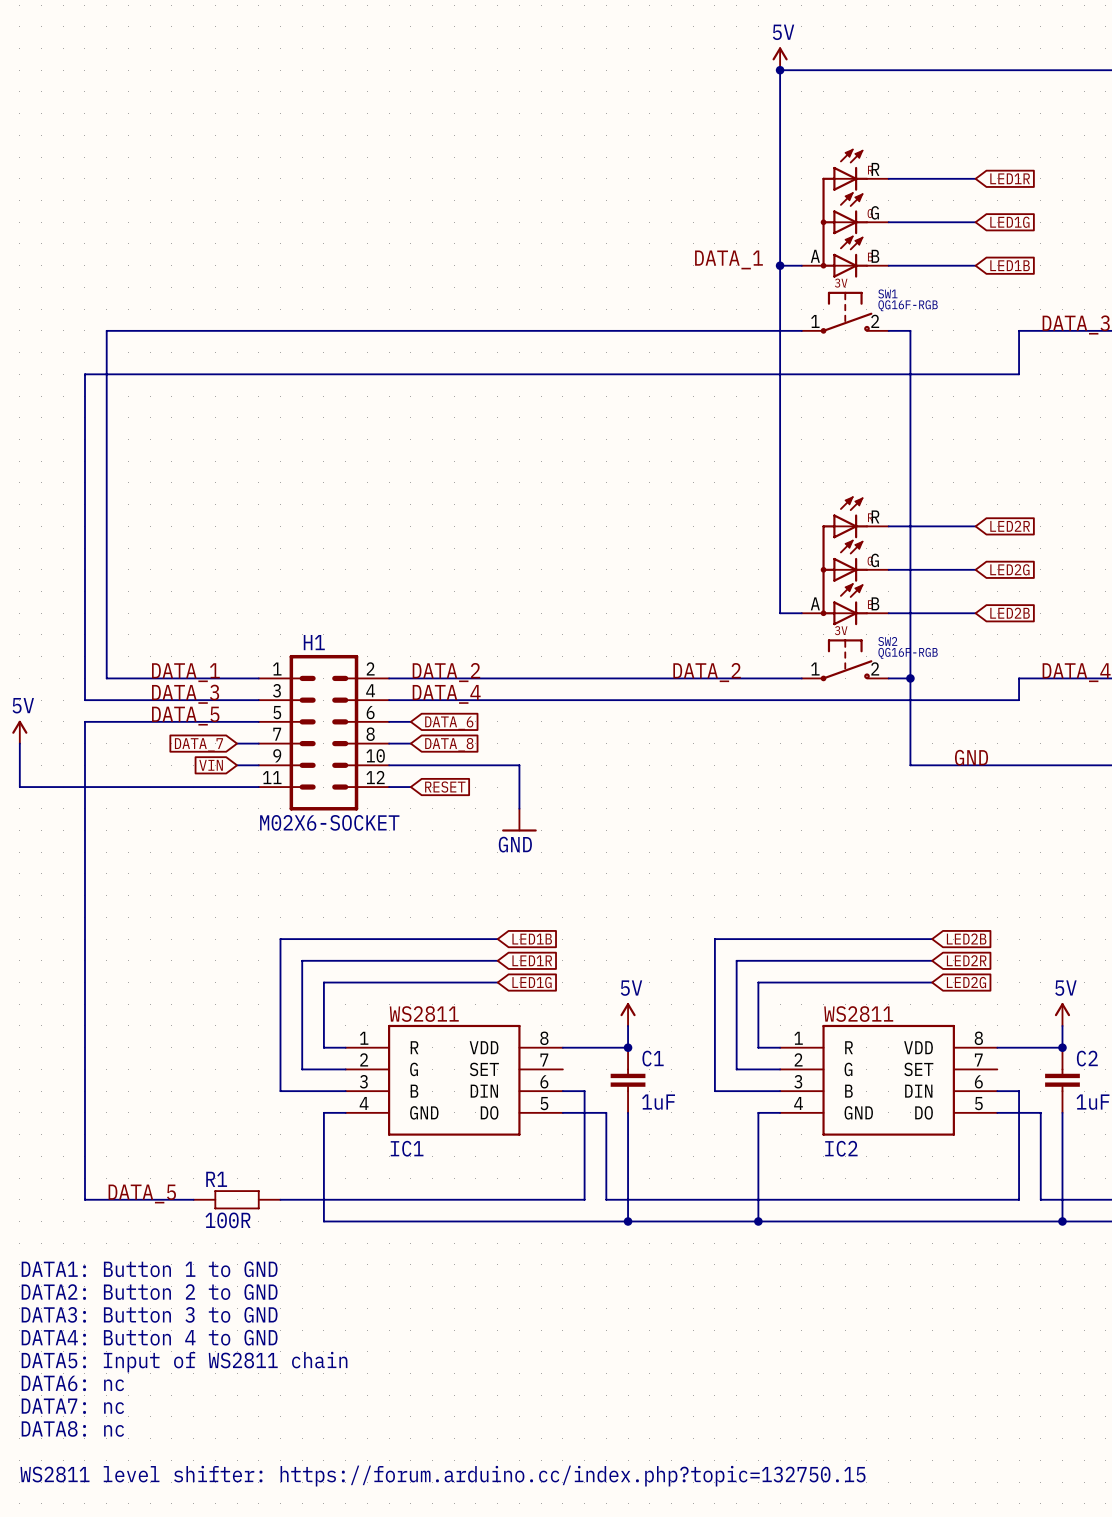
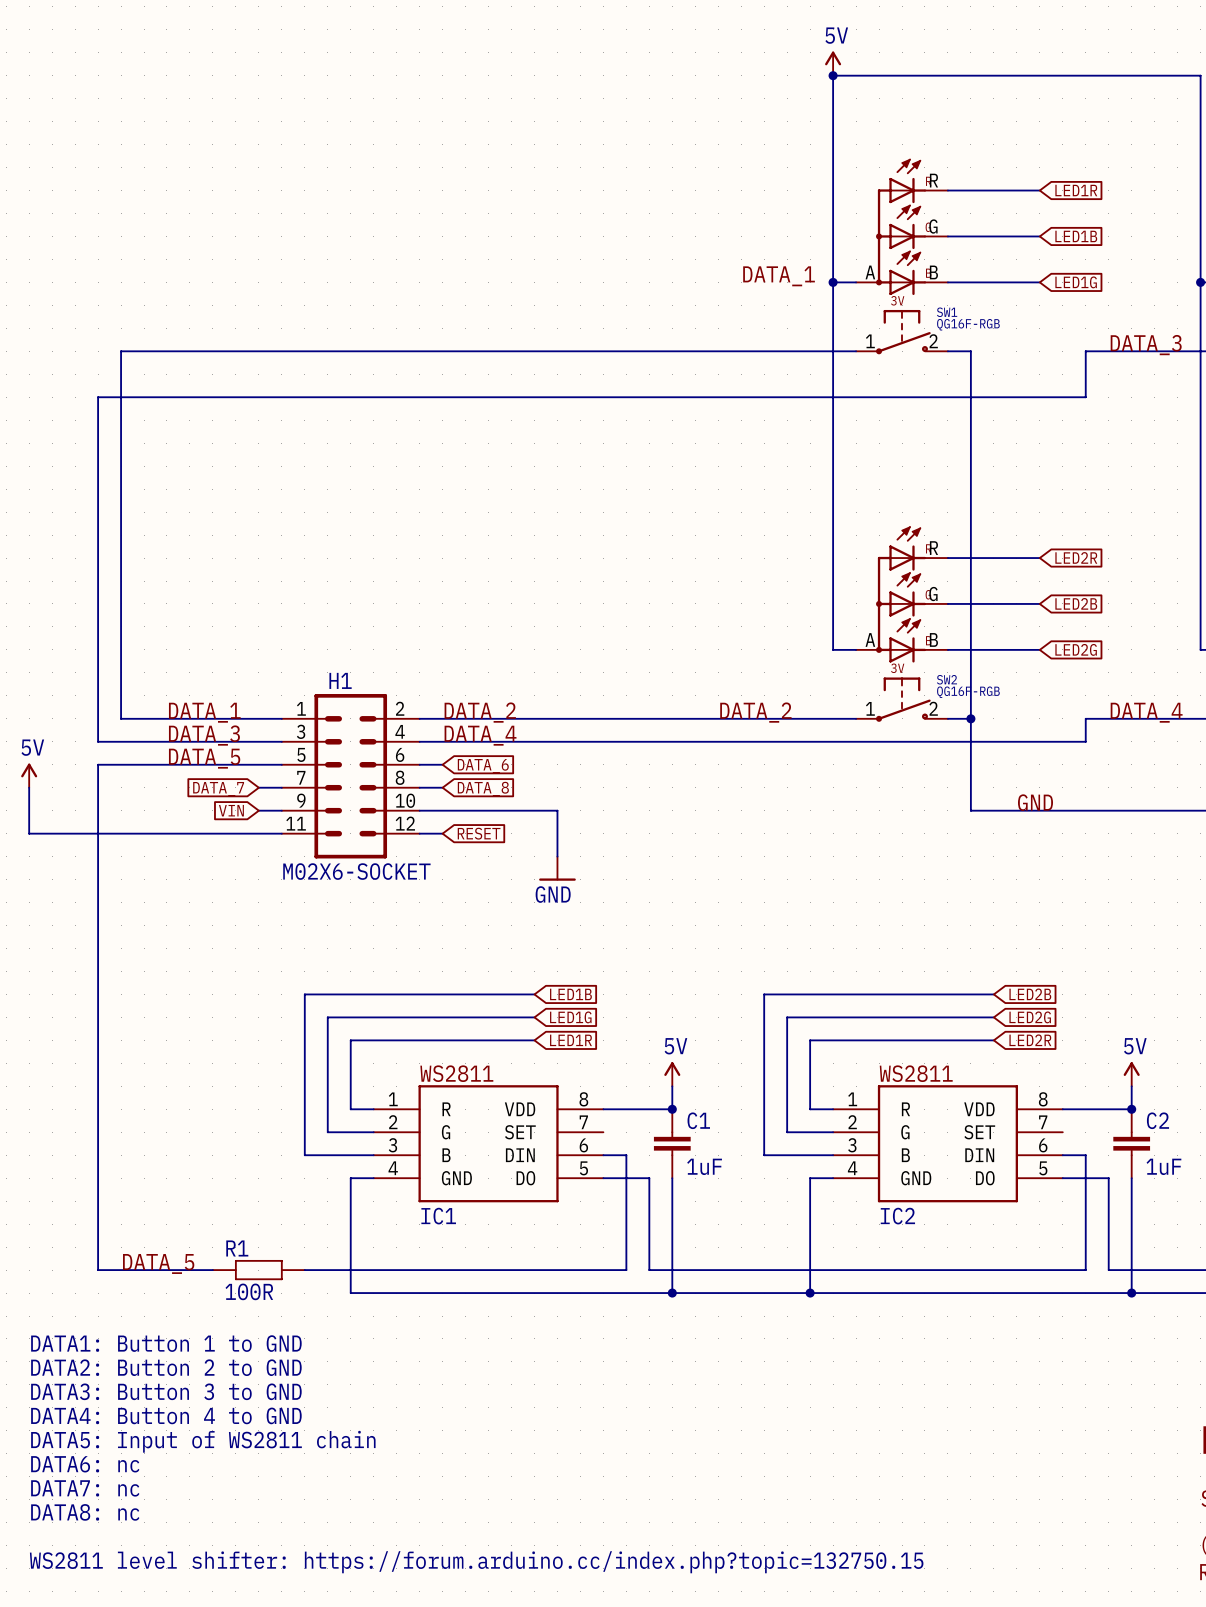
global label: LED1G (1009, 222) -> LED1B (1076, 236)
global label: LED1B (1010, 265) -> LED1G (1076, 282)
global label: LED2G (1009, 569) -> LED2B (1076, 603)
global label: LED2B (1010, 613) -> LED2G (1076, 649)
global label: LED1R (532, 960) -> LED1G (570, 1017)
global label: LED2R (966, 960) -> LED2G (1030, 1017)
global label: LED1G (532, 982) -> LED1R (571, 1040)
global label: LED2G (966, 982) -> LED2R (1030, 1040)

